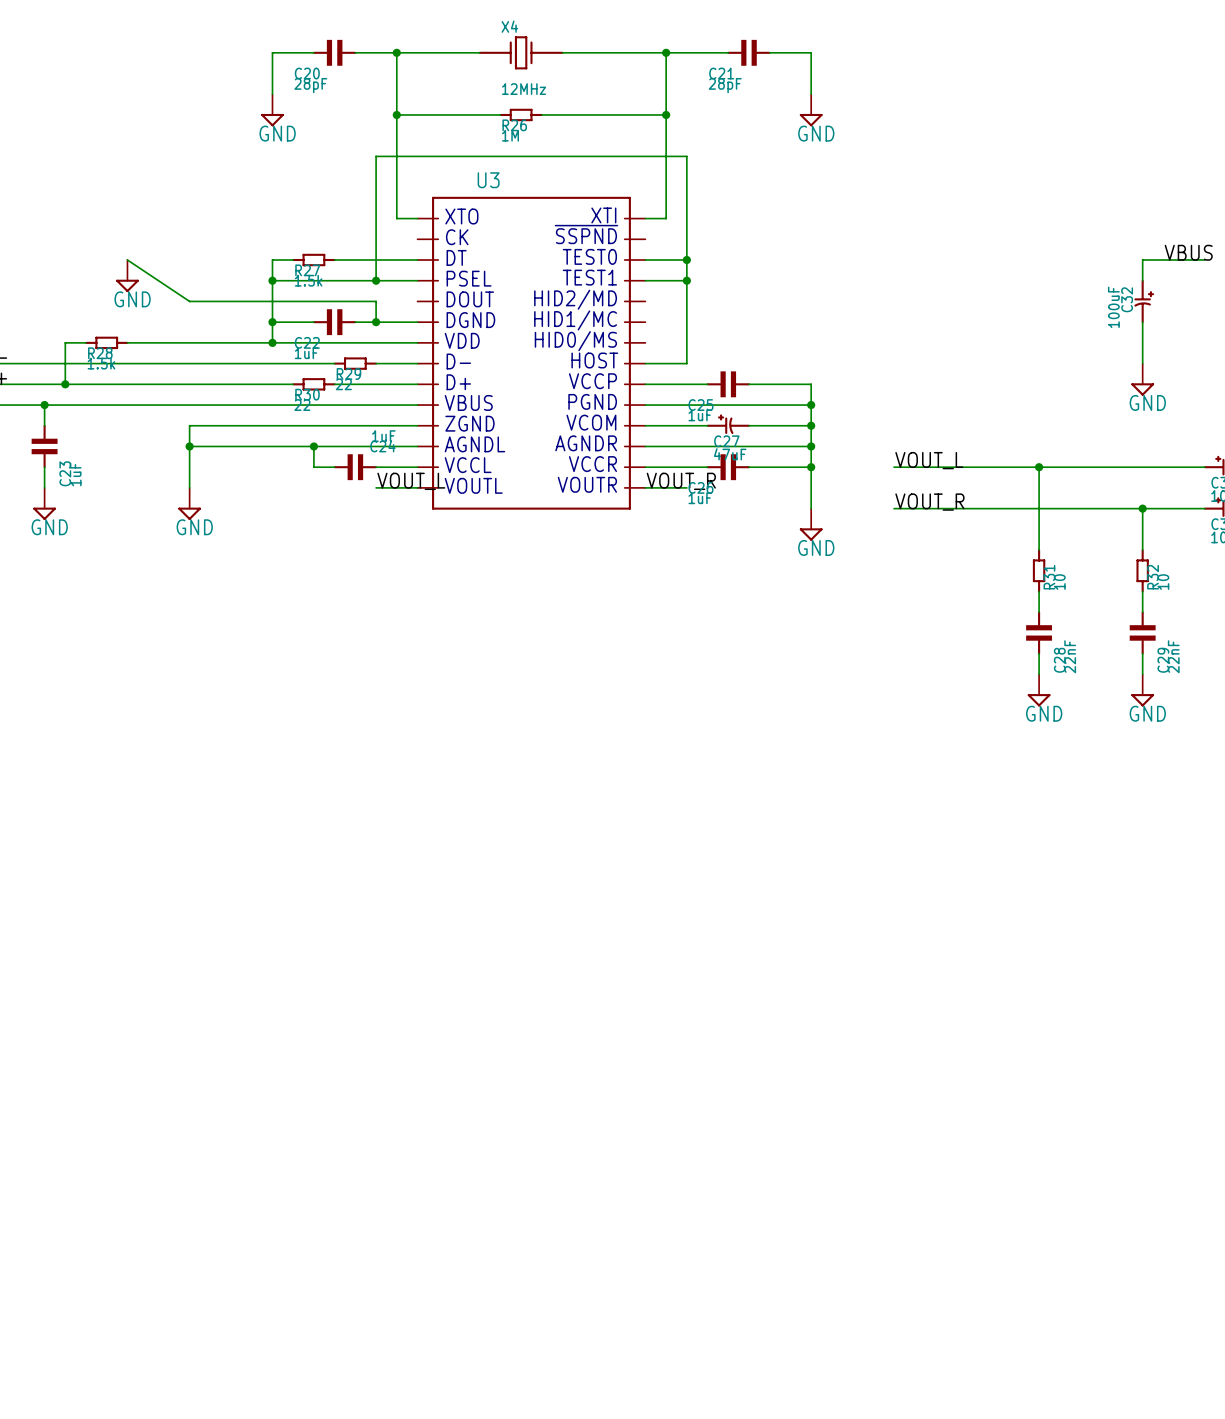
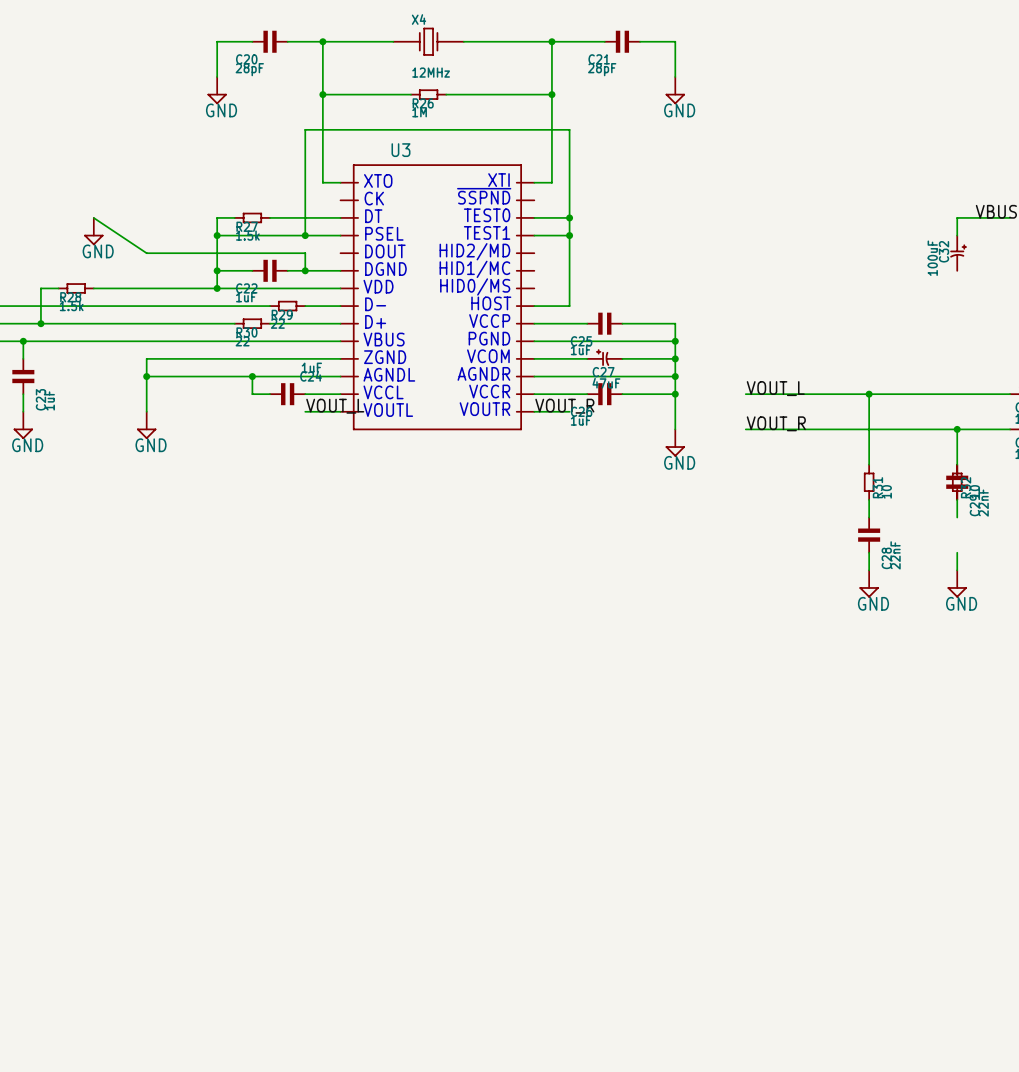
wire: (1142, 322) (1142, 363) -> none
power symbol: GND (1142, 379) -> none
C29 position: (1142, 632) -> (957, 482)

